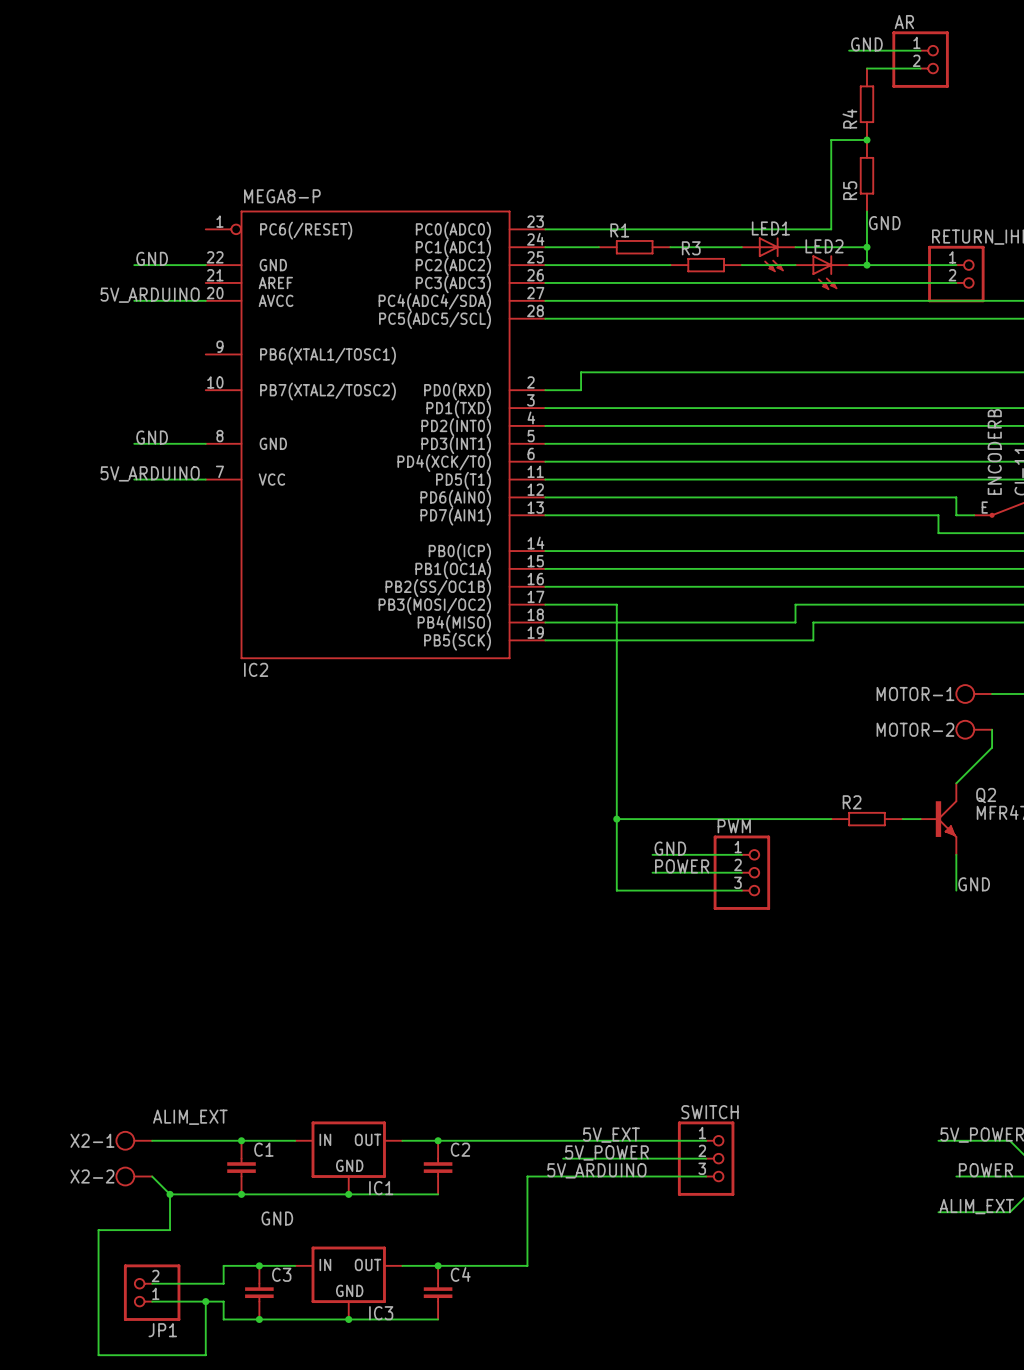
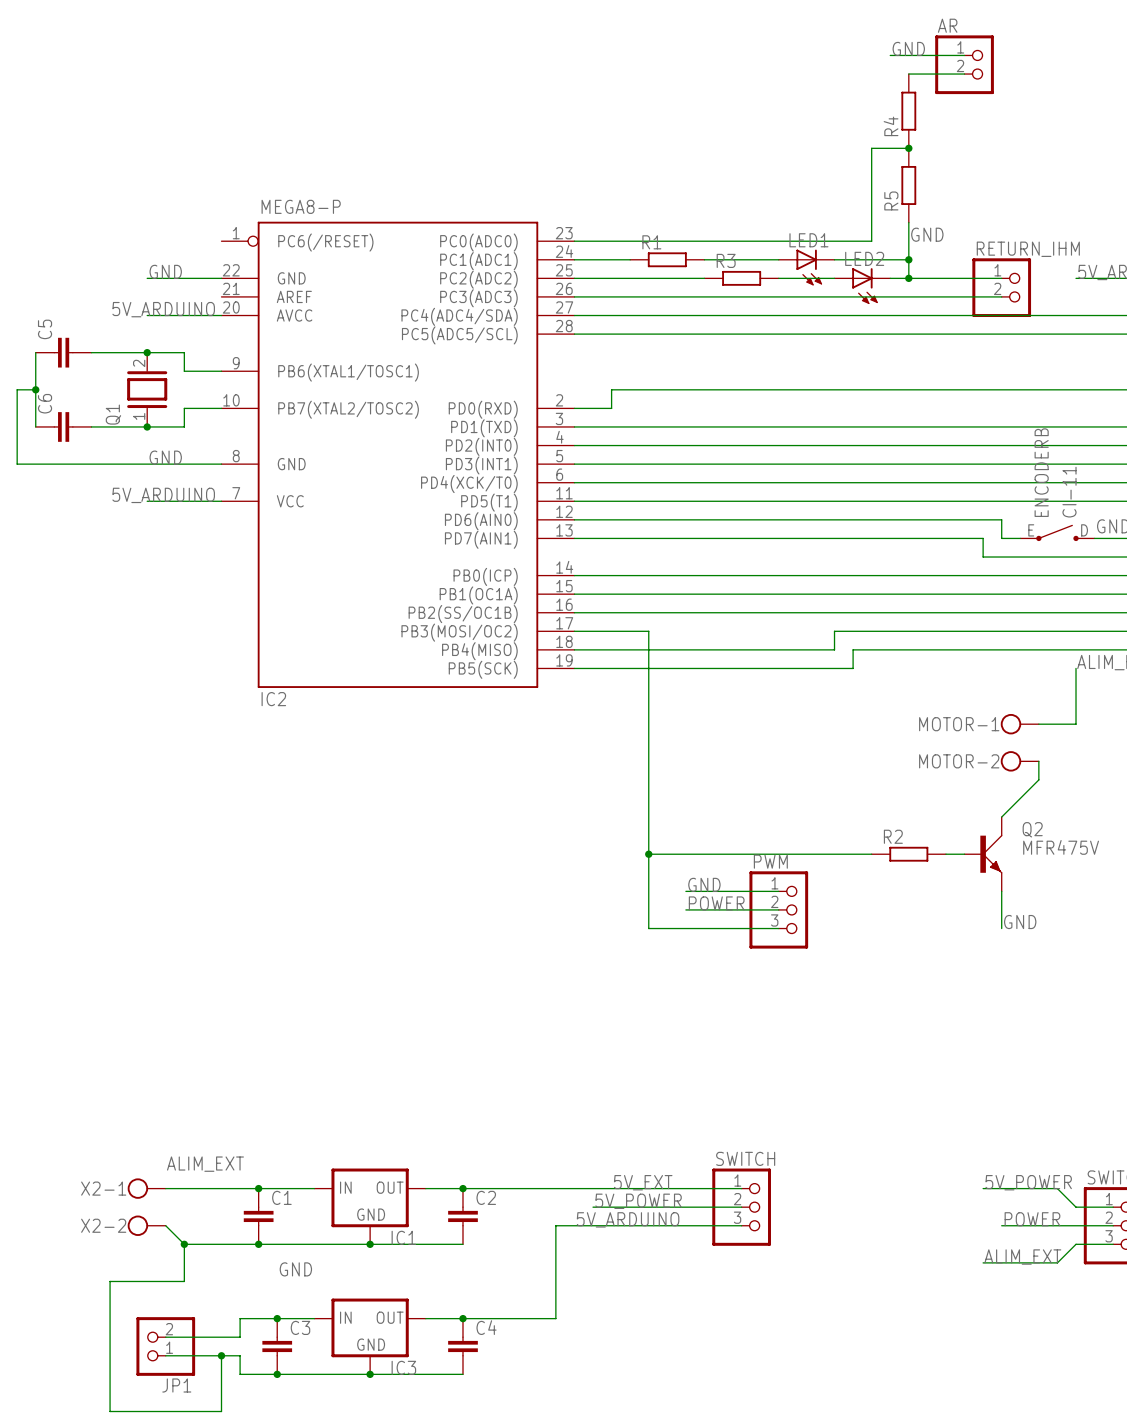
wire: none -> (35, 352) (35, 426)
C5: none -> (63, 352)
wire: none -> (91, 352) (184, 352) (184, 371) (221, 371)
junction: none -> (147, 352)
wire: none -> (35, 389) (17, 389) (17, 464) (147, 464)
junction: none -> (35, 389)
Q1: none -> (147, 389)
wire: none -> (221, 408) (184, 408) (184, 426) (91, 426)
C6: none -> (63, 426)
junction: none -> (147, 426)

